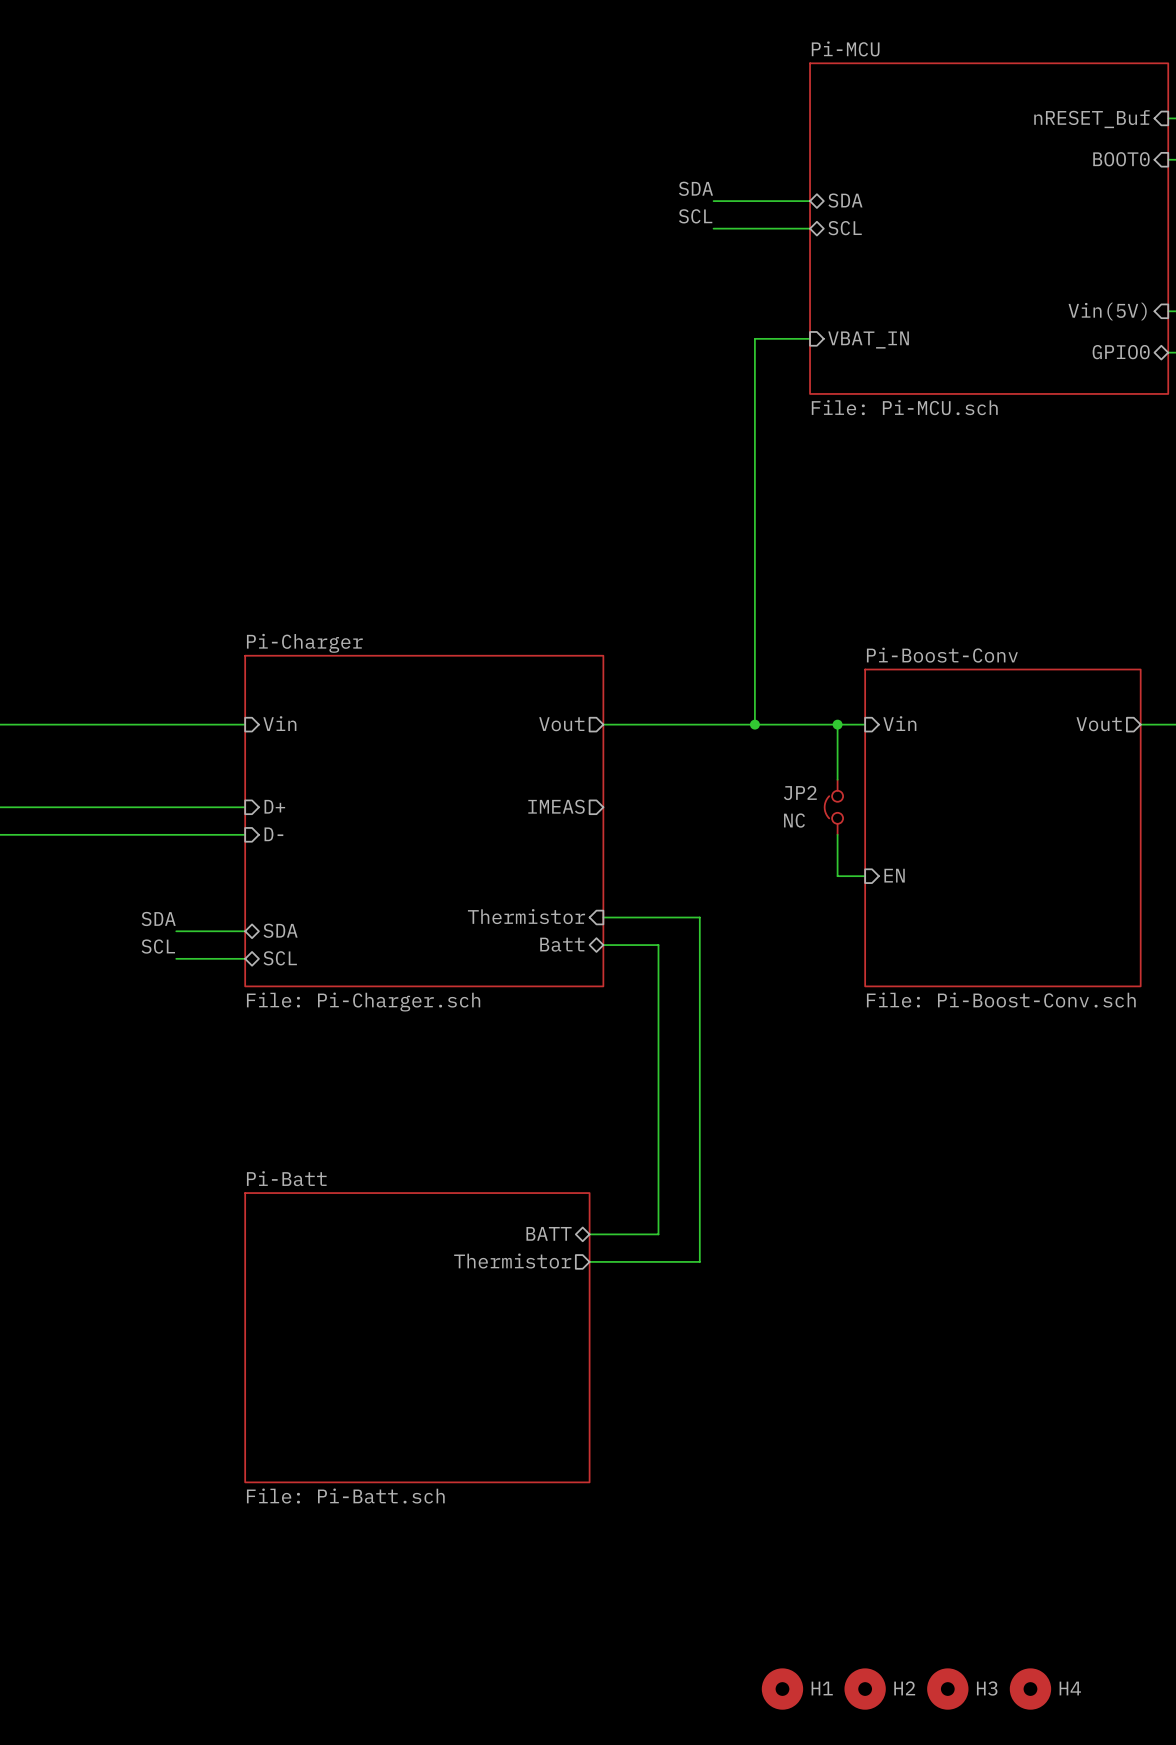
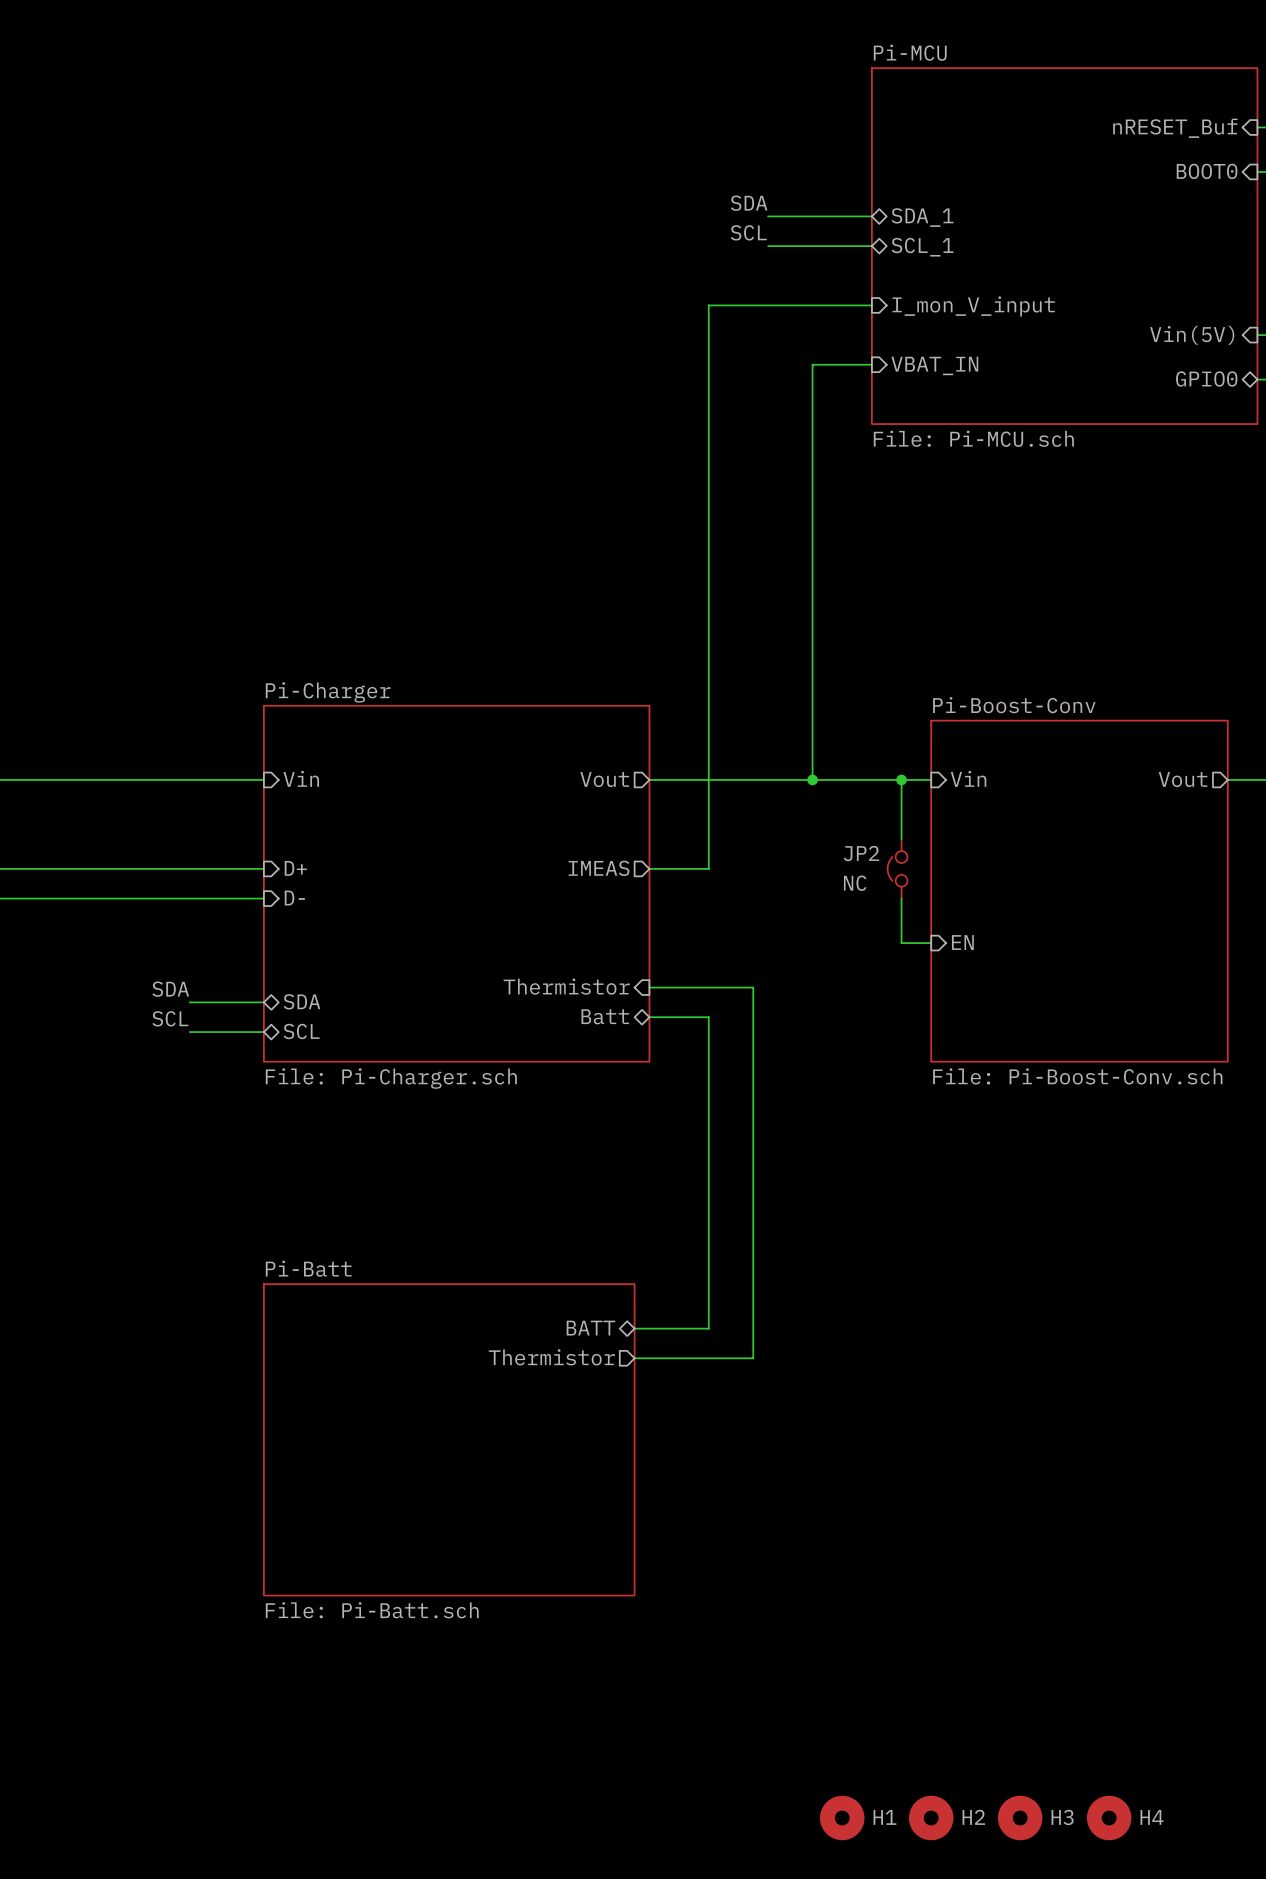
sheet pin: SDA (845, 200) -> SDA_1 (922, 217)
sheet pin: SCL (845, 228) -> SCL_1 (922, 247)
wire: none -> (871, 305) (708, 305) (708, 868) (649, 868)
sheet pin: none -> I_mon_V_input (973, 306)

